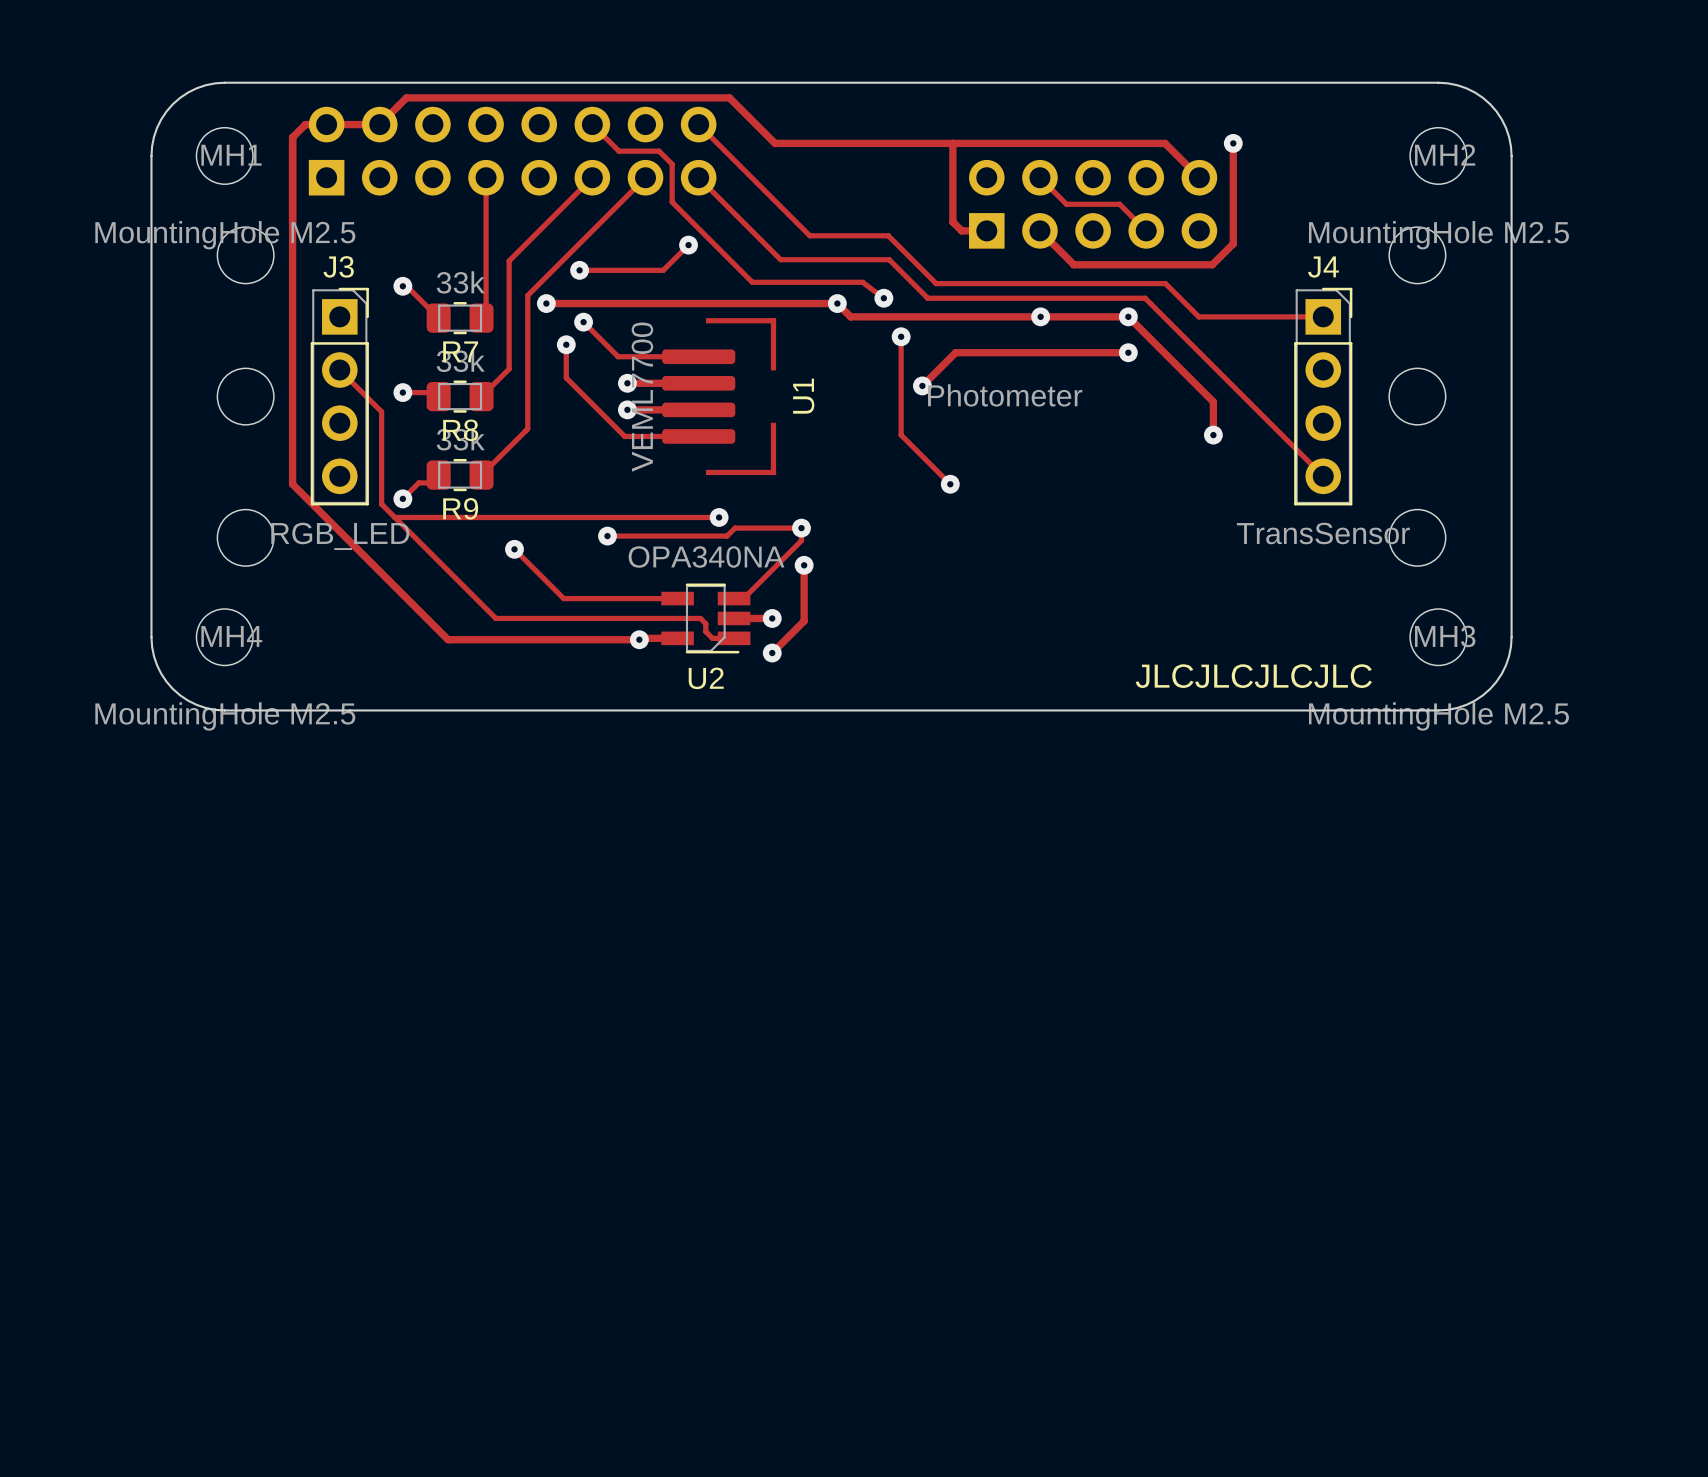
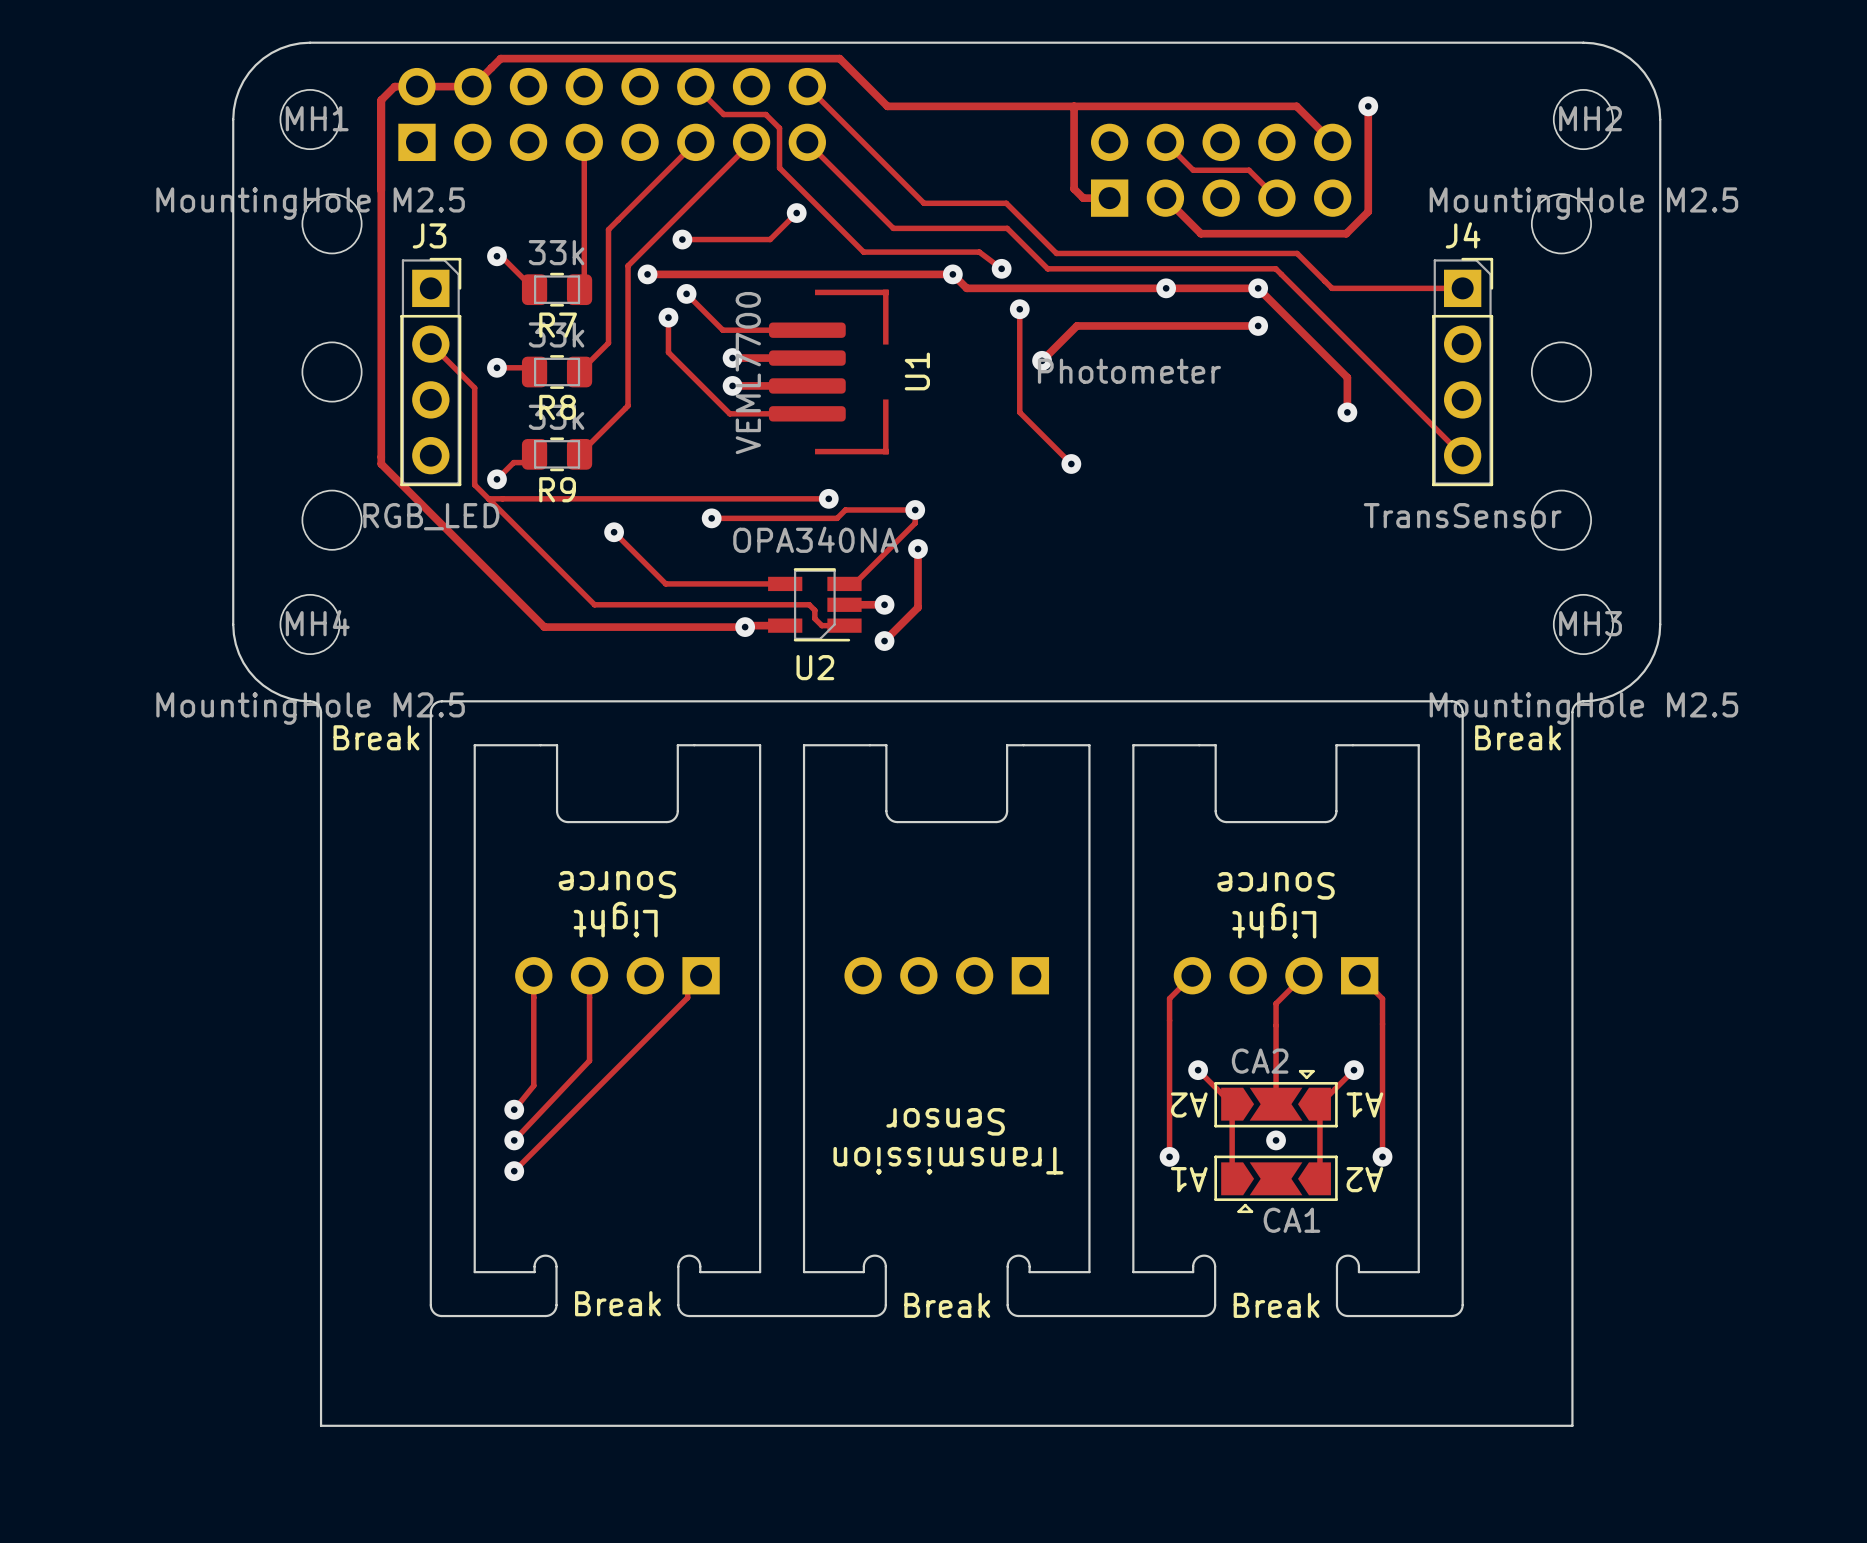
text: JLCJLCJLCJLC (1253, 676) -> none
board edge: (224, 710) (350, 710) -> (310, 701) (317, 704) (321, 712) (321, 1425) (1572, 1425) (1572, 712) (1575, 704) (1583, 701)
board edge: (1312, 710) (1438, 710) -> (1451, 701) (1459, 704) (1462, 712) (1462, 1305) (1459, 1312) (1451, 1316) (1346, 1315) (1340, 1312) (1336, 1305) (1337, 1265) (1343, 1256) (1350, 1256) (1355, 1258) (1358, 1263) (1358, 1272) (1418, 1272) (1418, 745) (1336, 745) (1336, 812) (1333, 818) (1325, 822) (1222, 821) (1215, 812) (1215, 745) (1133, 745) (1133, 1272) (1193, 1272) (1193, 1263) (1196, 1258) (1202, 1255) (1209, 1257) (1215, 1265) (1215, 1306) (1211, 1312) (1204, 1316) (1018, 1316) (1011, 1313) (1008, 1307) (1007, 1265) (1014, 1256) (1021, 1256) (1026, 1258) (1029, 1263) (1029, 1272) (1089, 1272) (1089, 745) (1007, 745) (1007, 812) (1003, 818) (996, 822) (893, 821) (886, 812) (886, 745) (804, 745) (804, 1272) (863, 1272) (864, 1263) (867, 1258) (873, 1255) (880, 1257) (885, 1265) (885, 1306) (882, 1312) (874, 1316) (689, 1316) (682, 1313) (678, 1307) (678, 1265) (685, 1256) (692, 1256) (697, 1258) (699, 1263) (700, 1272) (760, 1272) (760, 745) (677, 745) (677, 812) (674, 818) (666, 822) (563, 821) (557, 812) (557, 745) (474, 745) (474, 1272) (534, 1272) (534, 1263) (537, 1258) (542, 1256) (549, 1256) (556, 1265) (556, 1306) (553, 1312) (546, 1315) (436, 1314) (430, 1305) (430, 712) (434, 704) (441, 701)
text: none -> Break (376, 737)
text: none -> Break (1518, 737)
text: none -> Source (617, 884)
text: none -> Source (1276, 885)
text: none -> Light (615, 919)
text: none -> Light (1274, 920)
track: none -> (533, 975) (533, 1085) (514, 1109)
track: none -> (589, 975) (589, 1060) (514, 1140)
part: none -> (617, 975)
track: none -> (701, 975) (687, 989) (687, 997) (514, 1171)
part: none -> (946, 975)
track: none -> (1192, 975) (1169, 998) (1169, 1156)
part: none -> (1276, 975)
track: none -> (1303, 975) (1276, 1003) (1276, 1104)
track: none -> (1359, 975) (1382, 998) (1382, 1156)
track: none -> (1198, 1070) (1232, 1104) (1232, 1178)
via: none -> (1198, 1070)
track: none -> (1353, 1070) (1319, 1104) (1319, 1178)
via: none -> (1353, 1070)
part: none -> CA2 (1276, 1098)
text: none -> A2 (1189, 1105)
text: none -> A1 (1364, 1105)
via: none -> (514, 1109)
text: none -> Sensor (945, 1121)
via: none -> (514, 1140)
via: none -> (1276, 1140)
via: none -> (1169, 1156)
via: none -> (1382, 1156)
text: none -> Transmission (948, 1160)
via: none -> (514, 1171)
text: none -> A1 (1189, 1179)
text: none -> A2 (1364, 1179)
part: none -> CA1 (1276, 1184)
text: none -> Break (617, 1303)
text: none -> Break (947, 1305)
text: none -> Break (1276, 1305)

